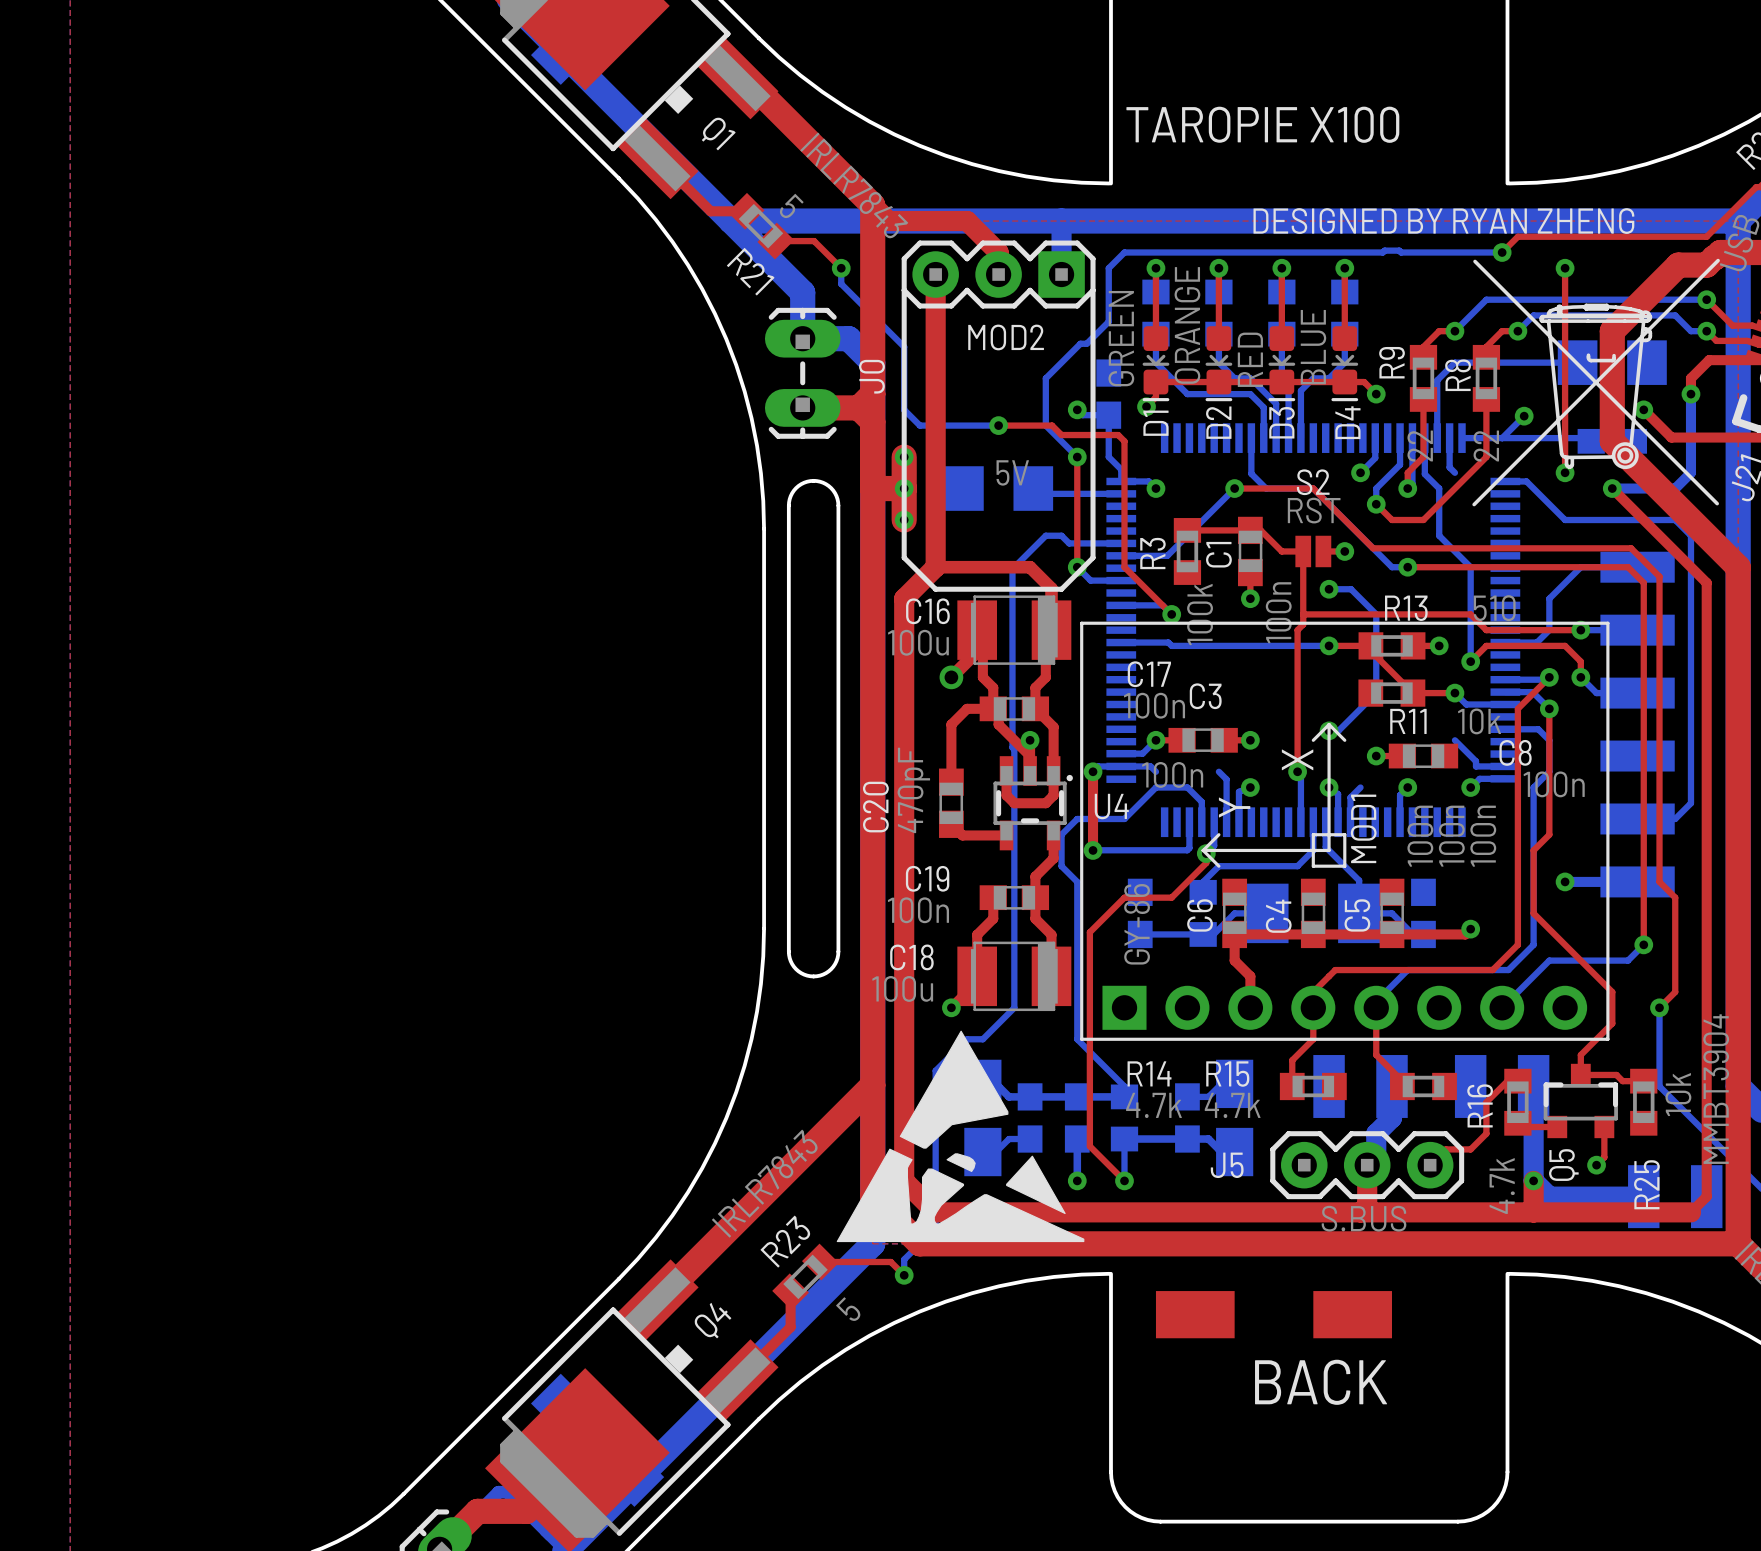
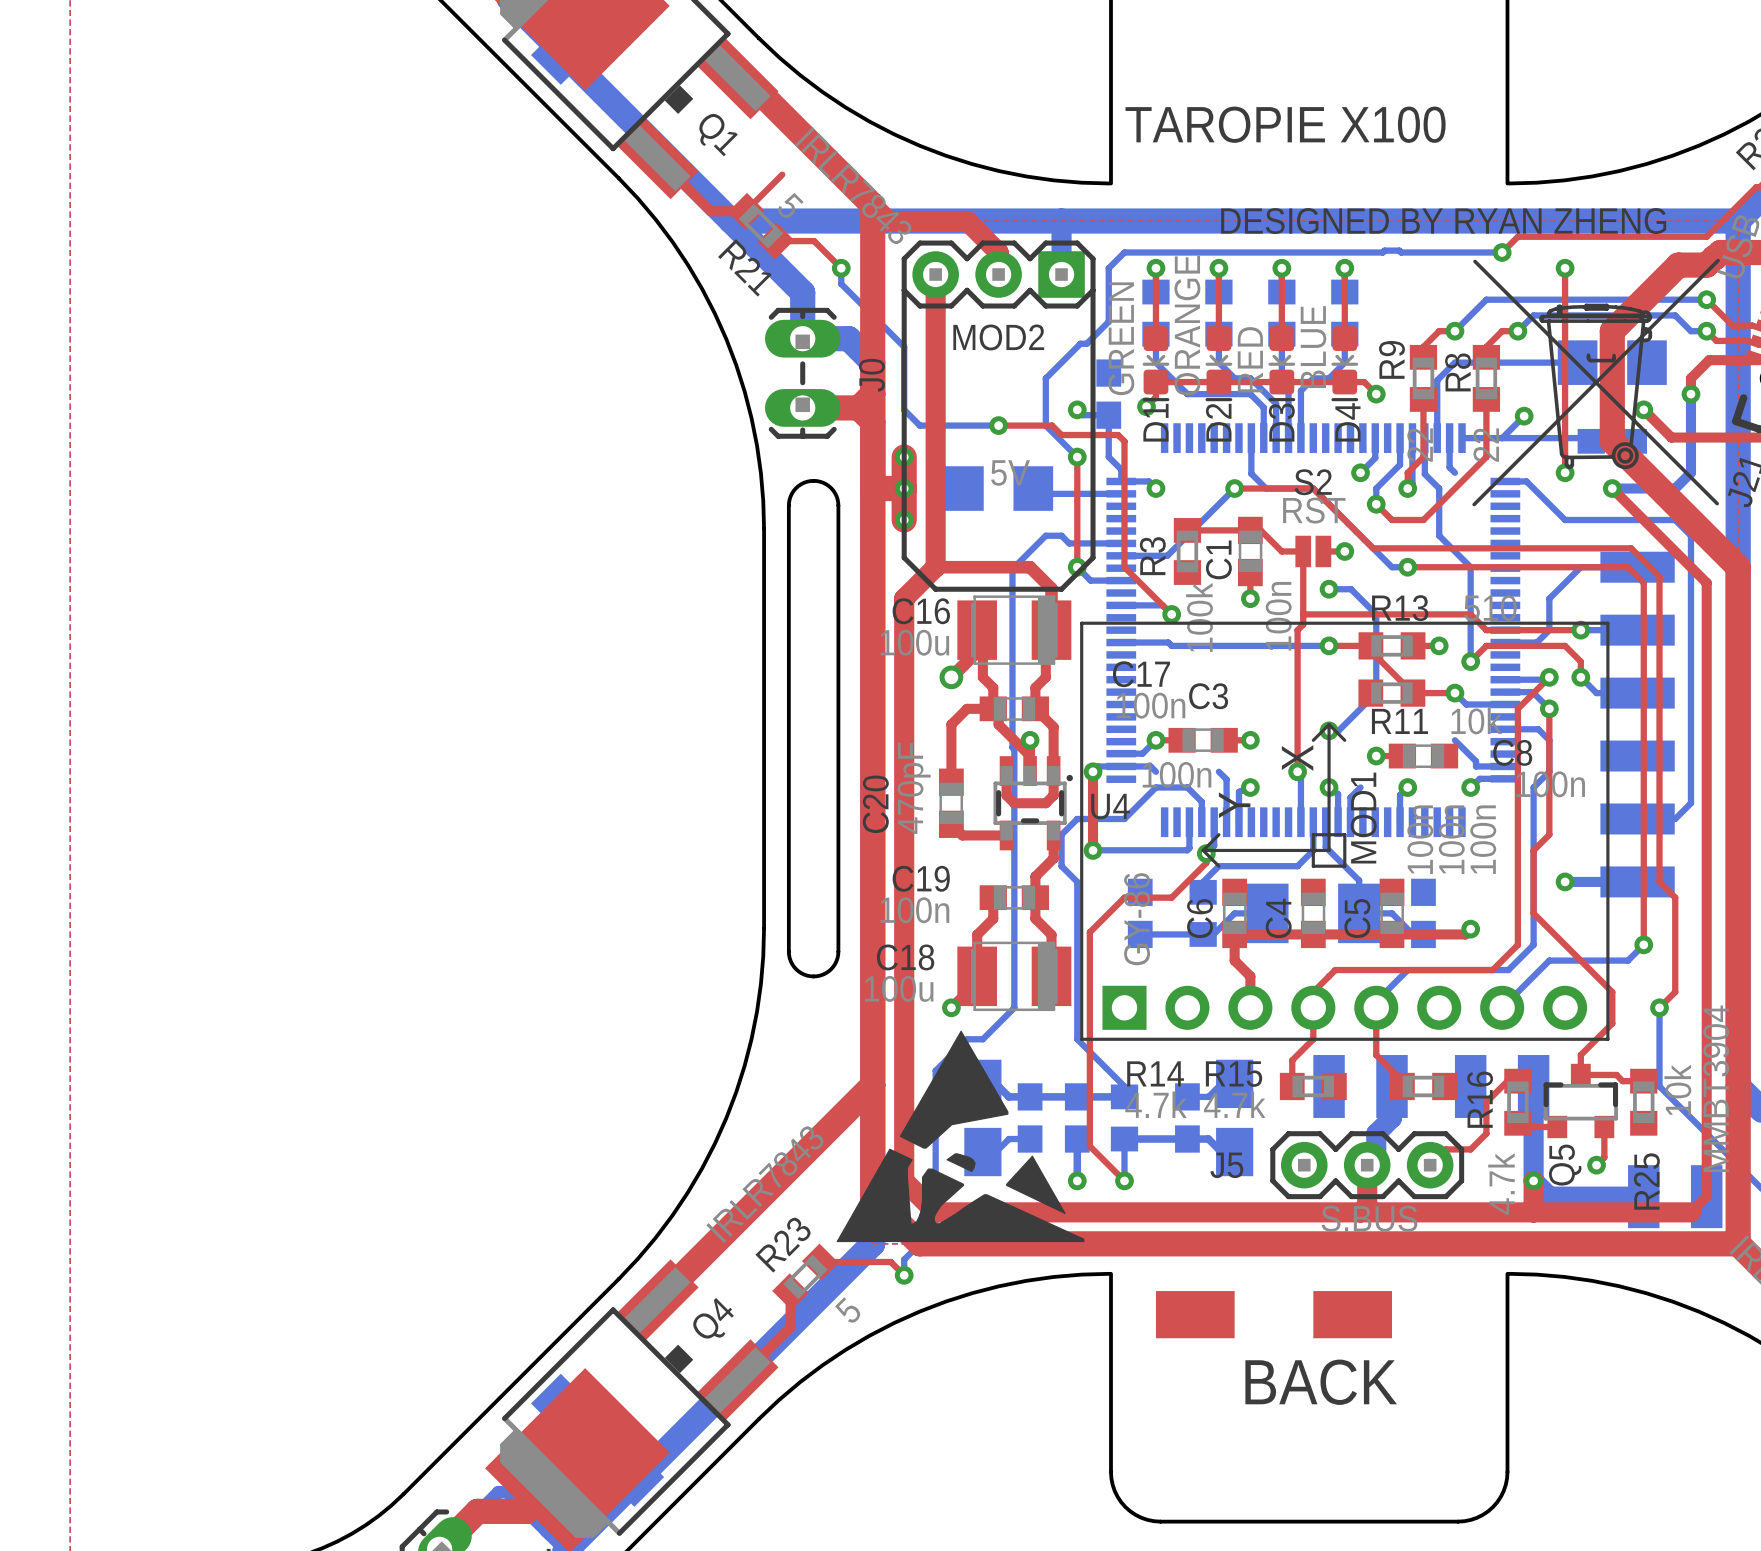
top track: none -> (782, 174) (746, 210)

